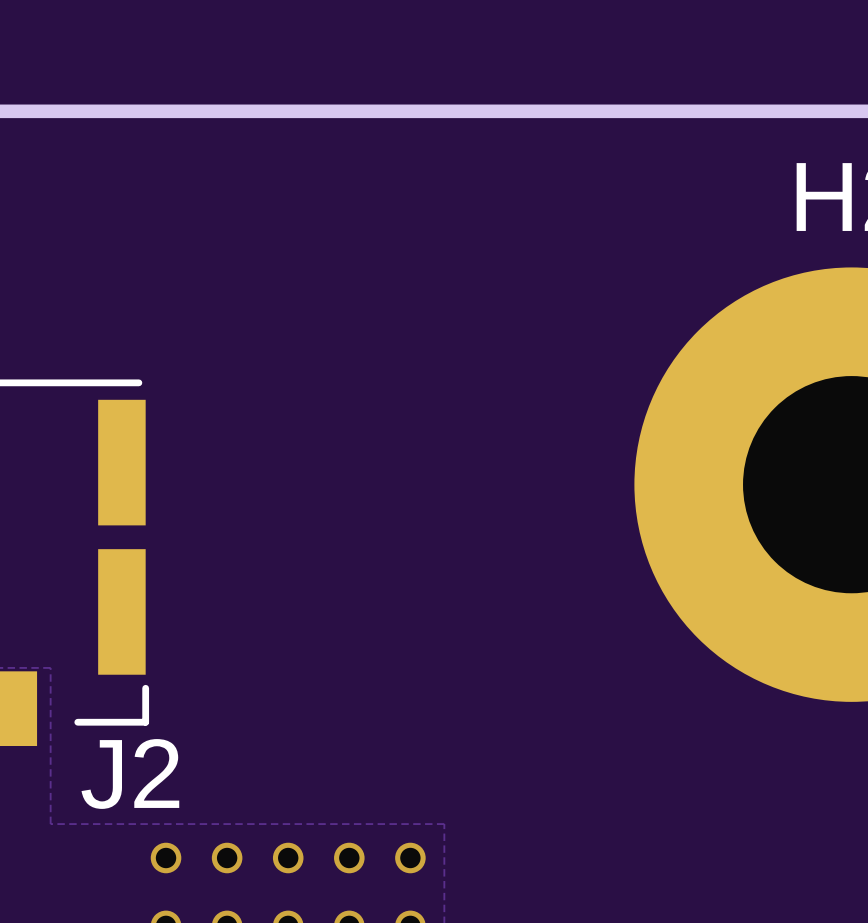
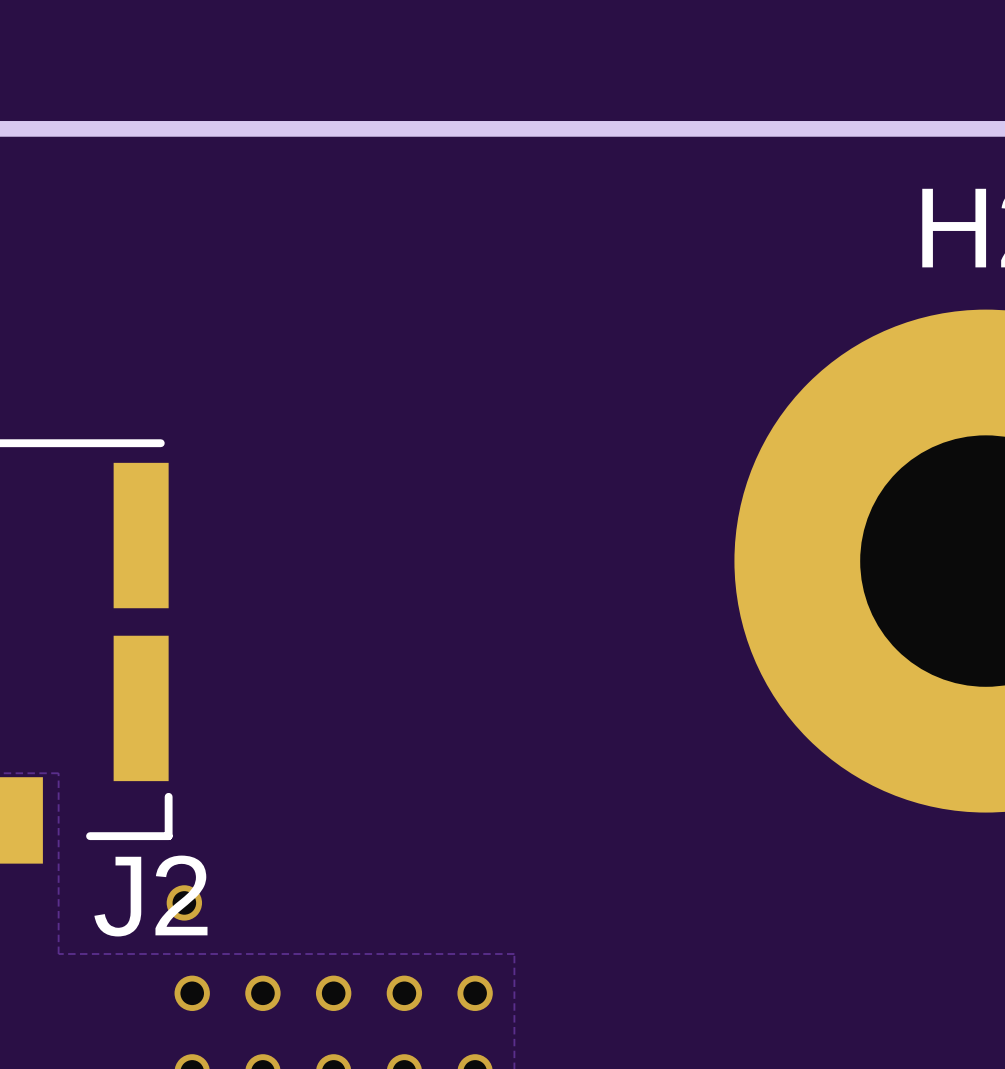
via: none -> (184, 902)

